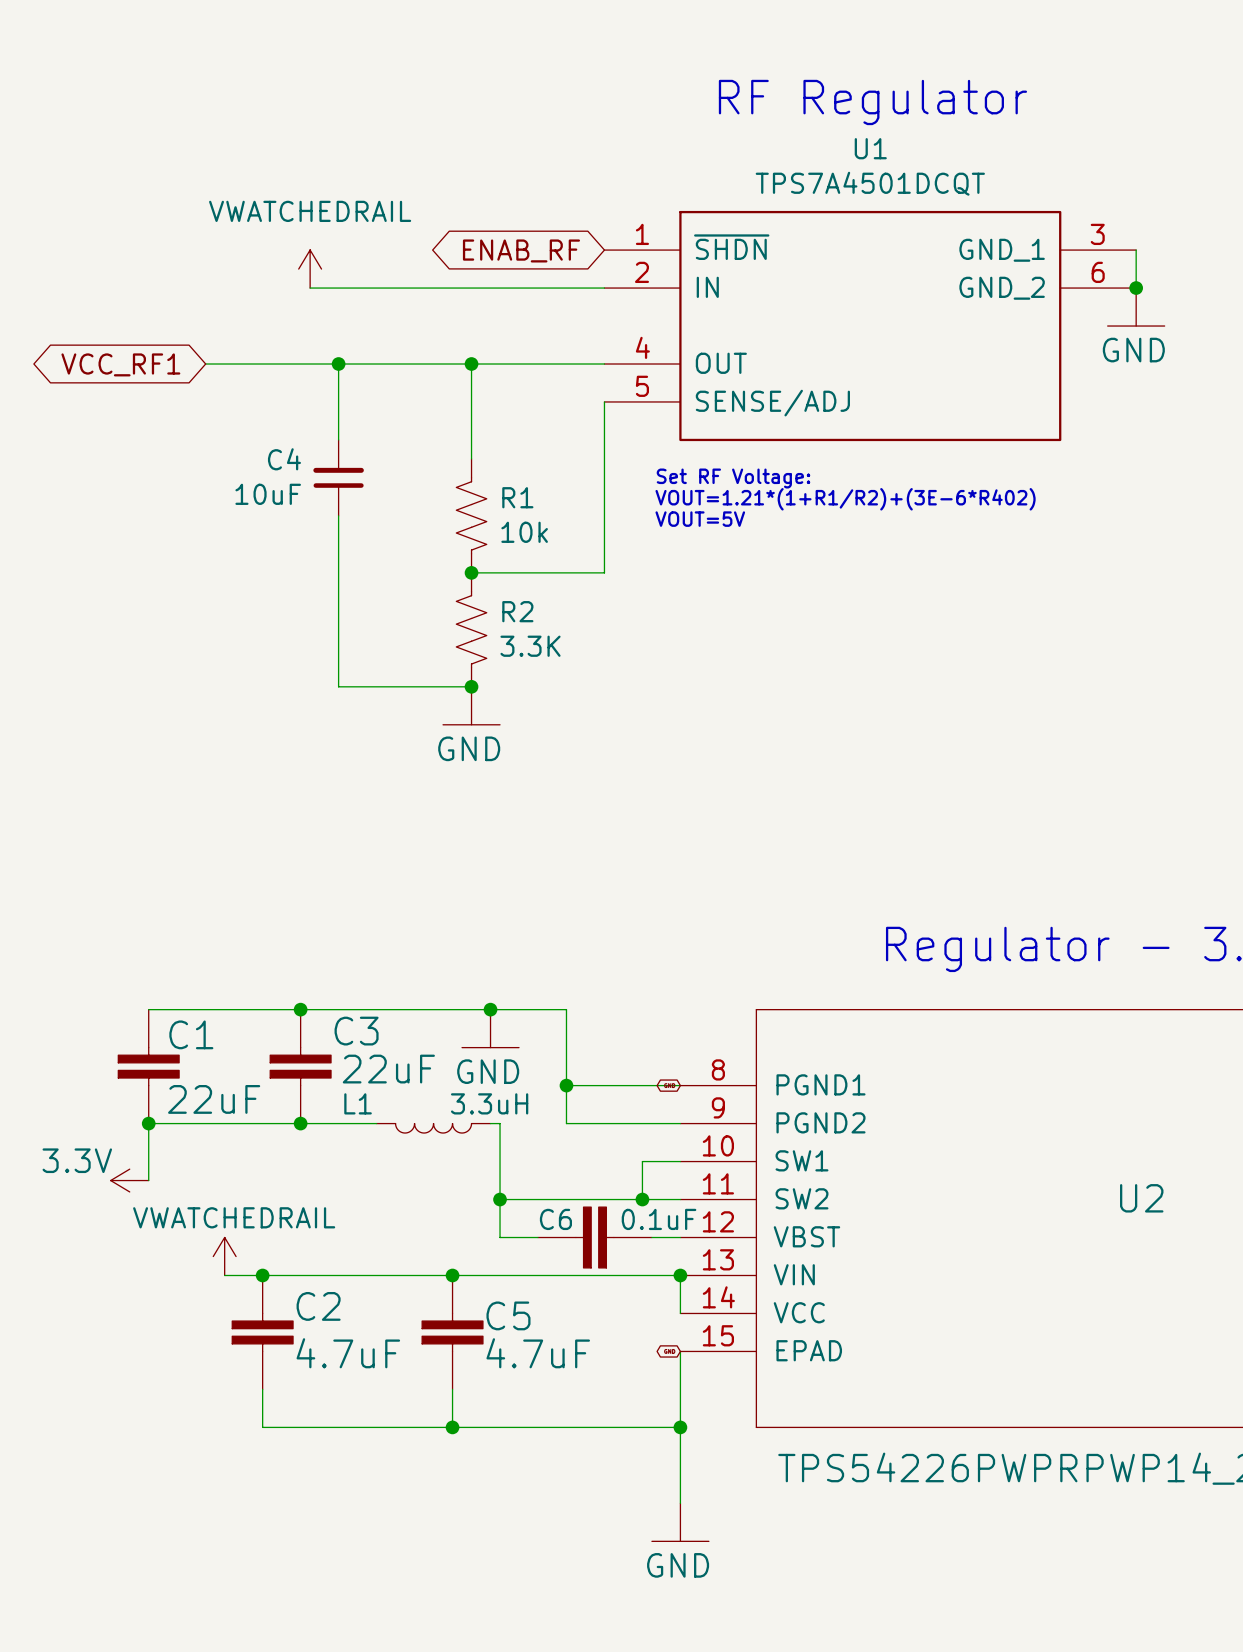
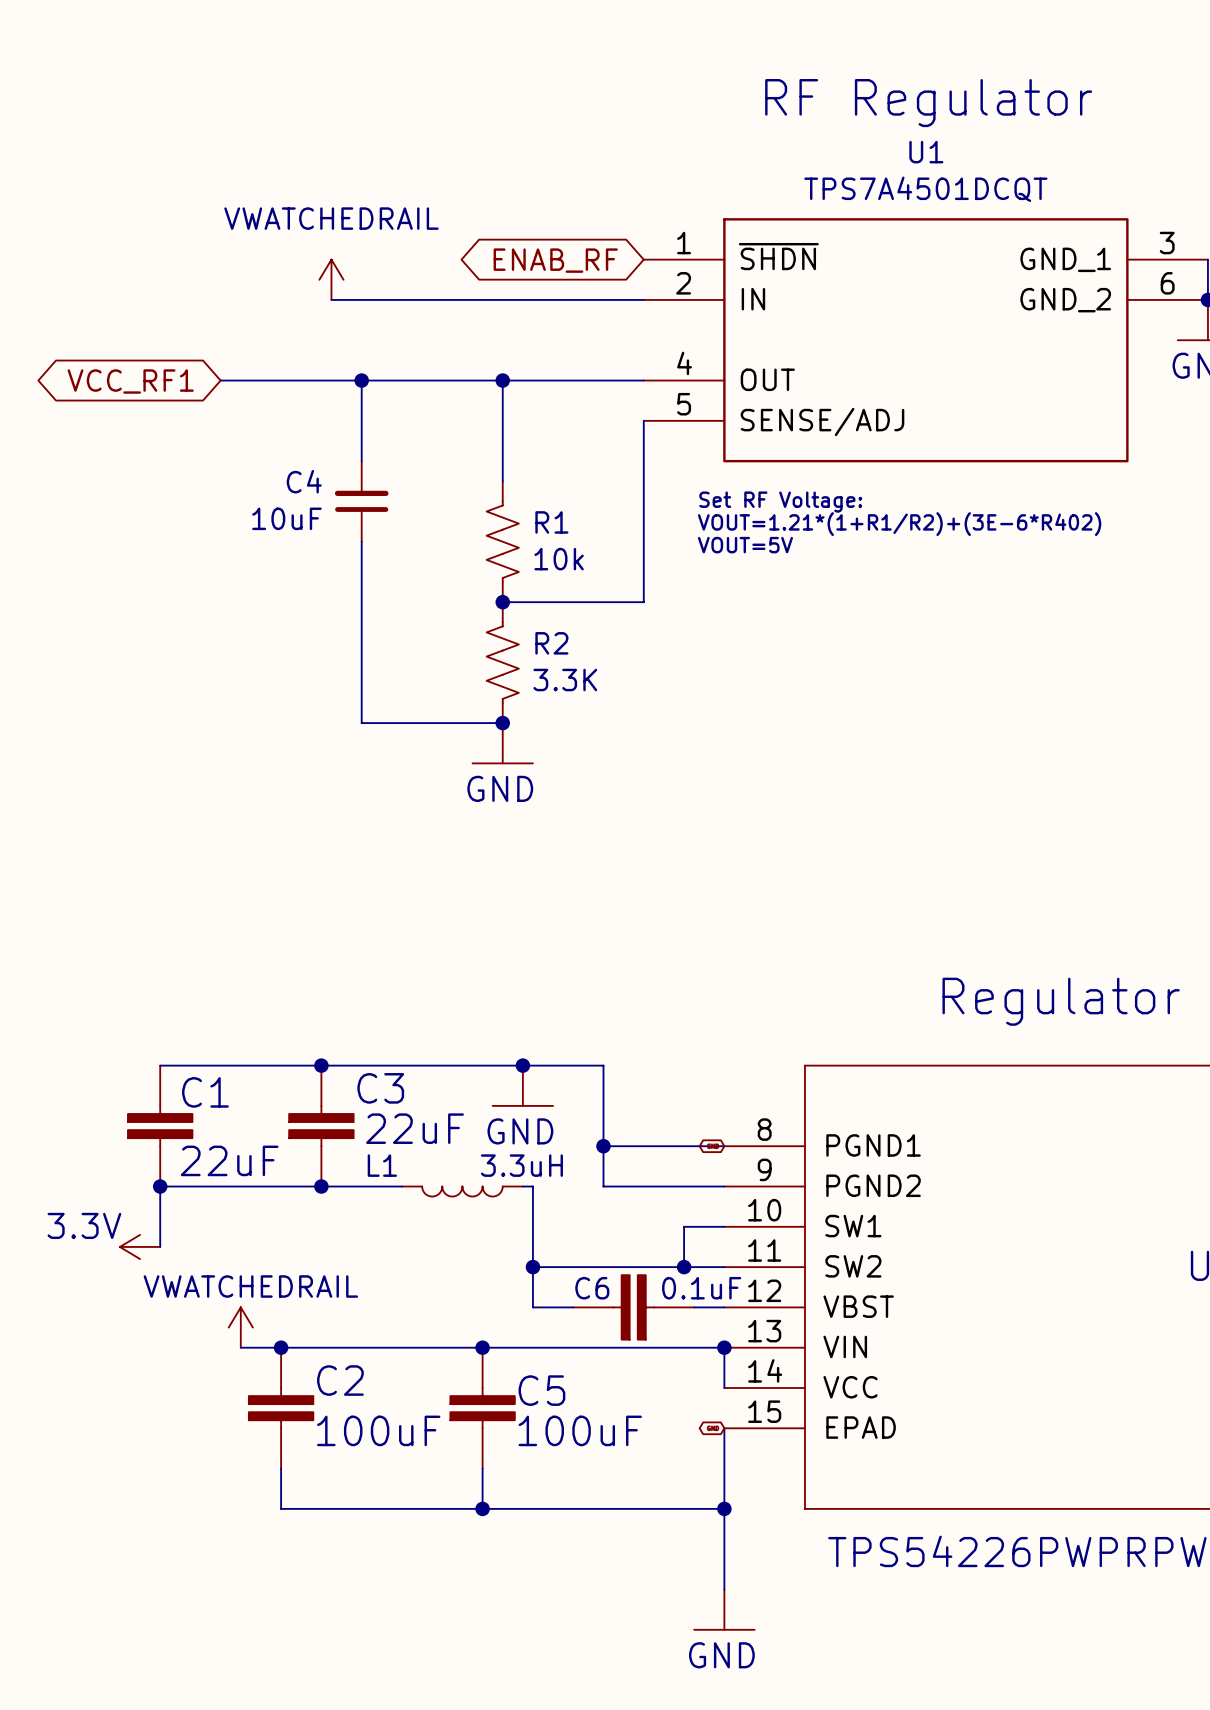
C2 value: 4.7uF (348, 1353) -> 100uF (378, 1430)
C5 value: 4.7uF (538, 1353) -> 100uF (580, 1430)

